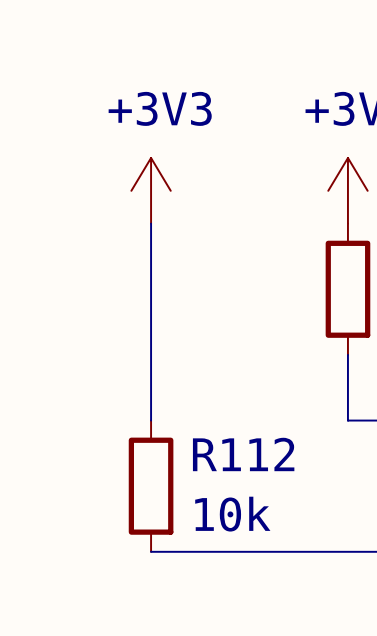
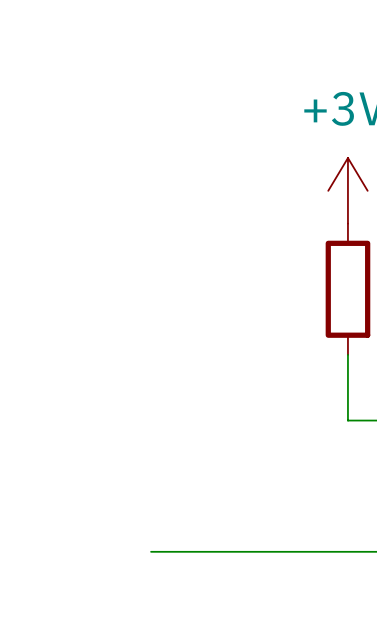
power symbol: +3V3 (151, 190) -> none
wire: (151, 223) (151, 420) -> none
R112: 10k (151, 486) -> none

